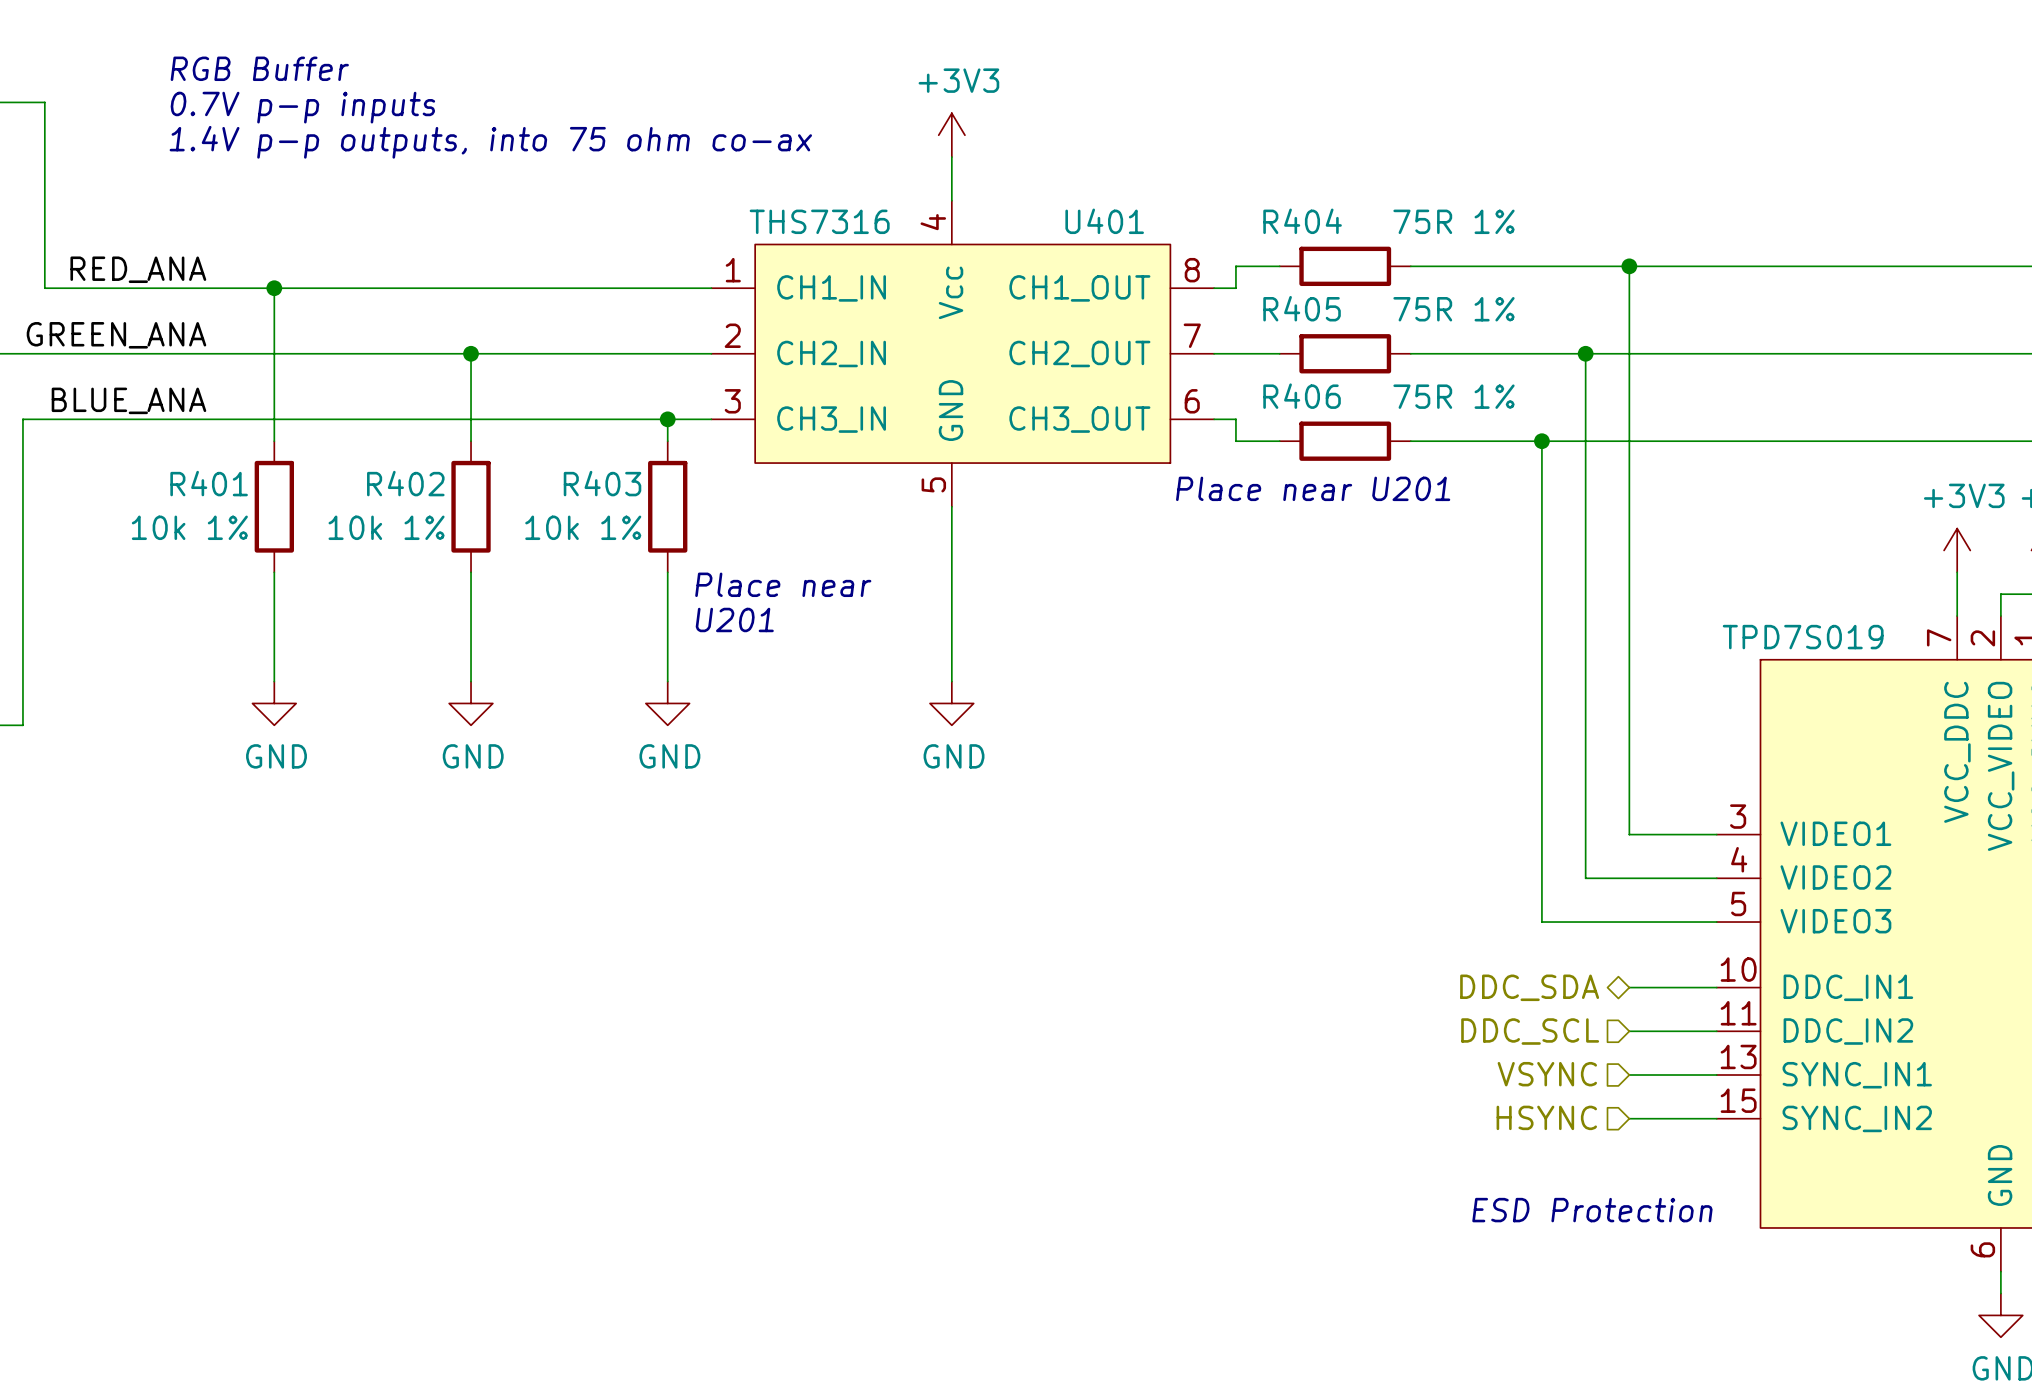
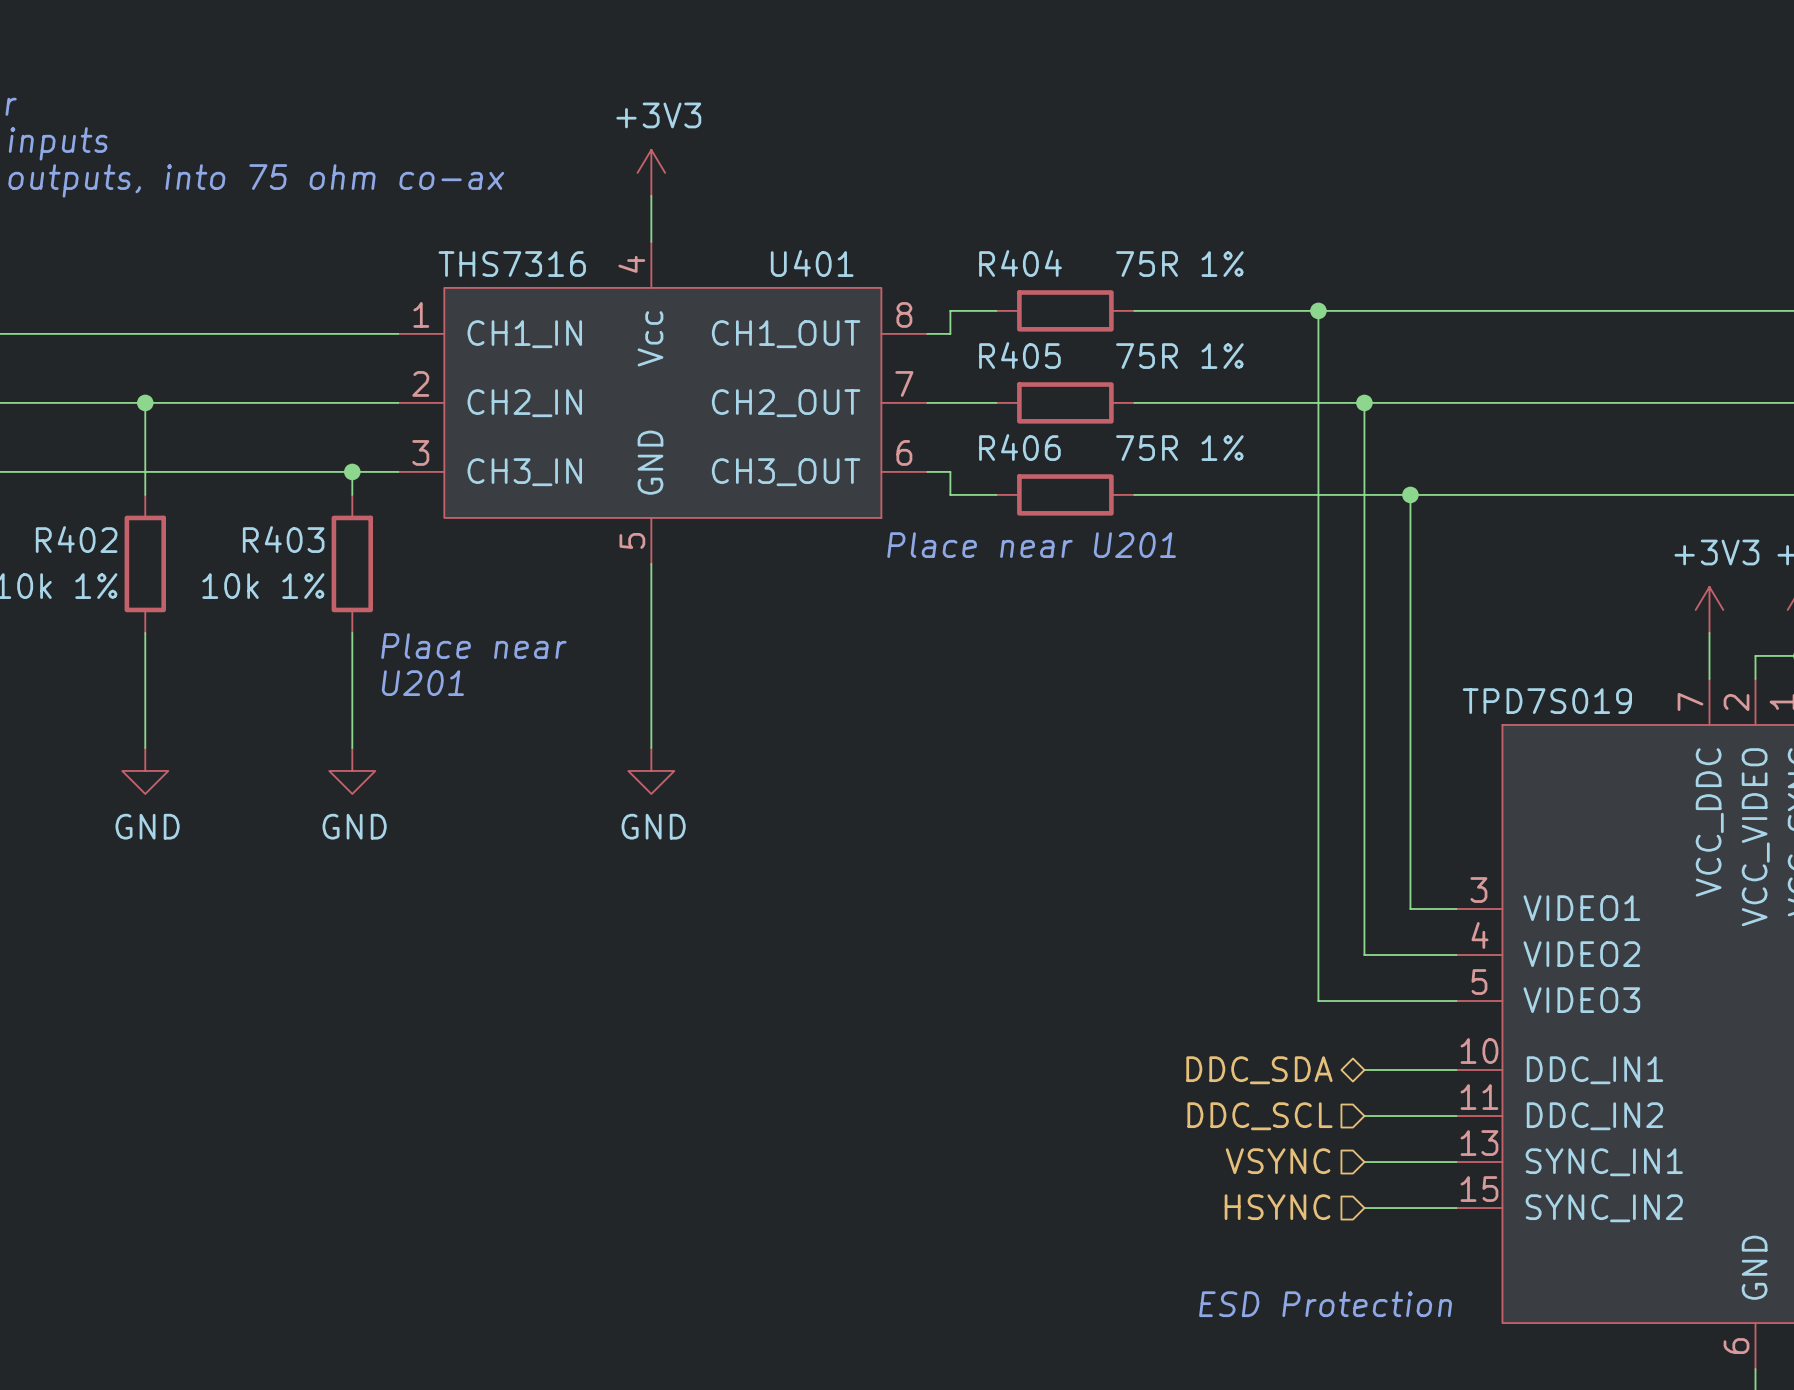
junction: none -> (1318, 310)
wire: (1629, 266) (1629, 353) -> (1318, 310) (1318, 402)
junction: (1629, 266) -> none
junction: (1585, 353) -> none
junction: none -> (1364, 402)
wire: (1541, 441) (1541, 922) (1585, 922) -> none
junction: (1541, 441) -> none
wire: none -> (1410, 494) (1410, 908)
junction: none -> (1410, 494)
wire: (1629, 834) (1673, 834) -> (1364, 908) (1364, 955)
wire: (1585, 878) (1629, 878) -> (1318, 955) (1318, 1001)

